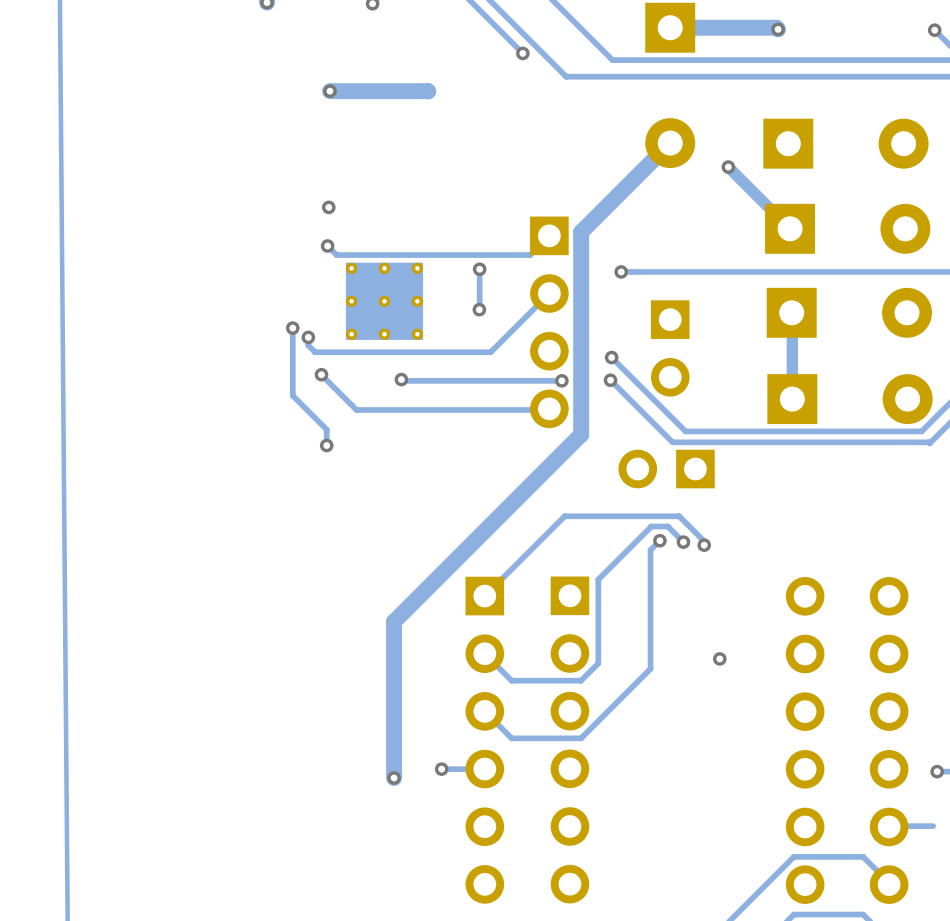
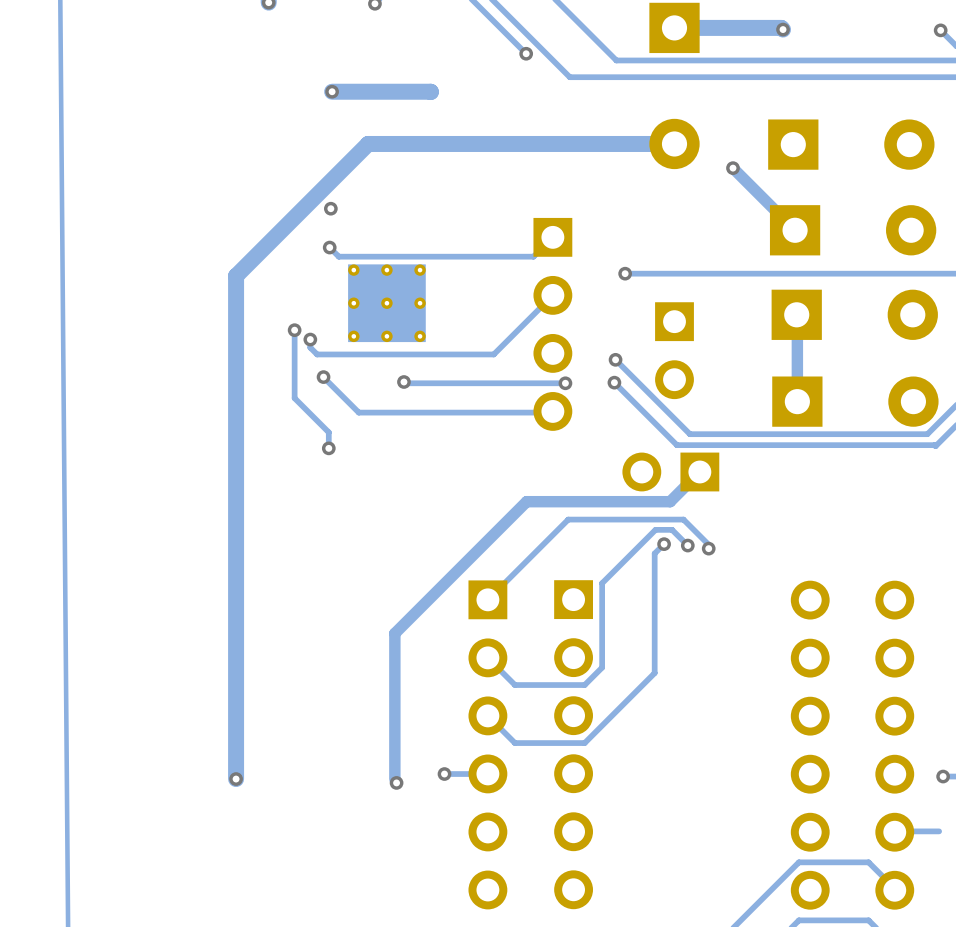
track: (670, 143) (581, 232) (581, 434) (394, 621) (394, 777) -> (674, 143) (368, 143) (236, 276) (236, 779)
track: (479, 269) (479, 309) -> none
via: (479, 269) -> none
via: (479, 309) -> none
track: none -> (699, 471) (670, 501) (526, 501) (394, 633) (394, 779)
via: (719, 658) -> none
via: none -> (236, 779)

